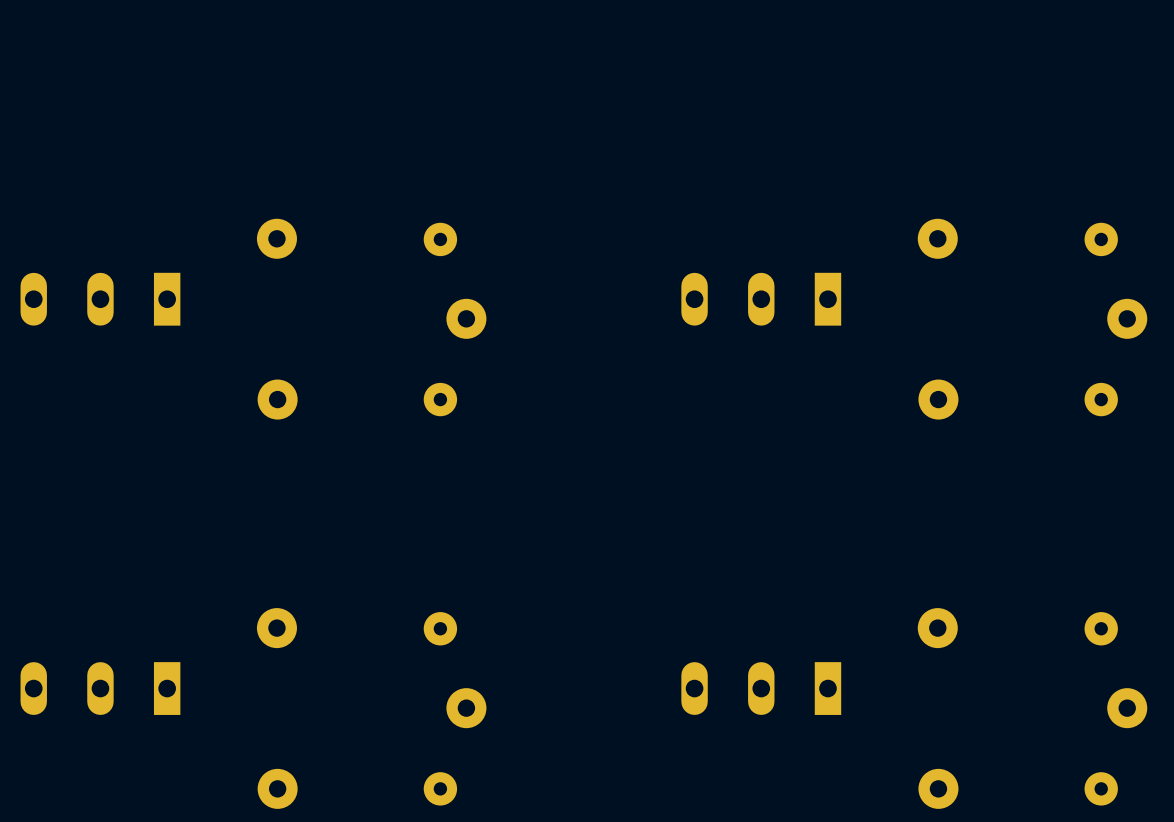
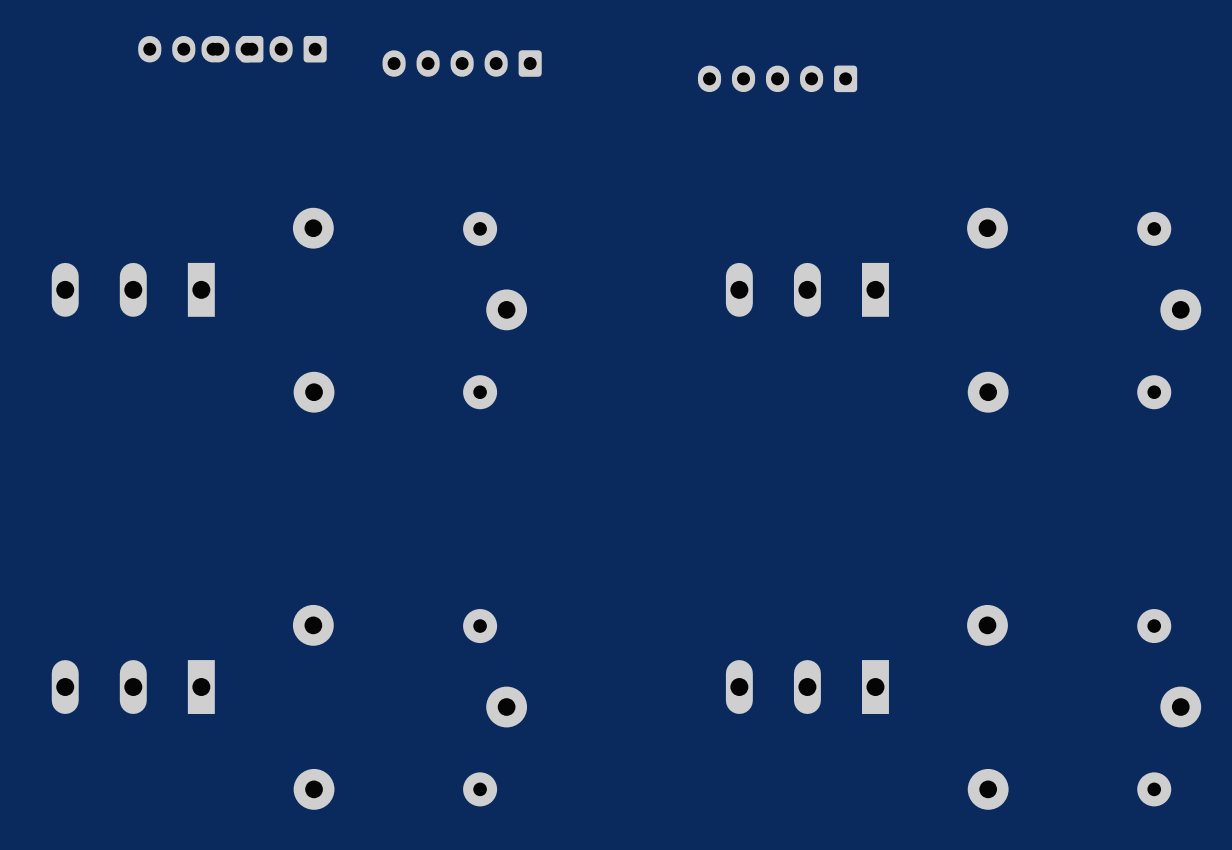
part: none -> (200, 49)
part: none -> (264, 49)
part: none -> (462, 63)
part: none -> (777, 78)

